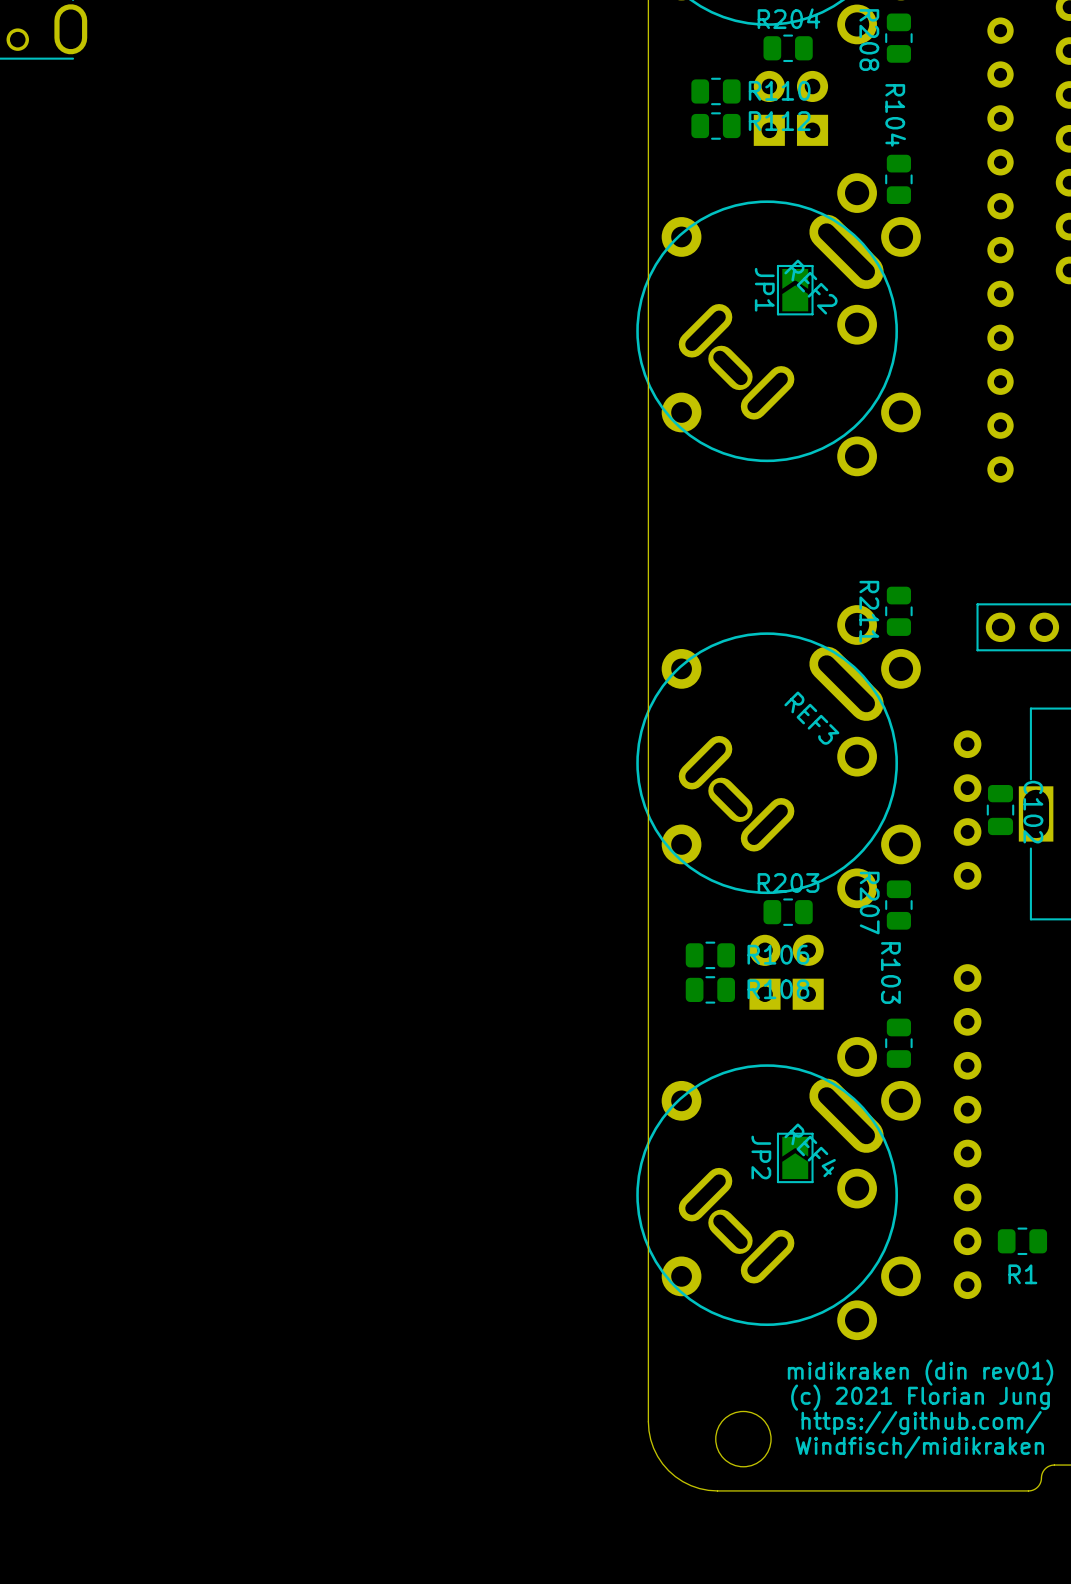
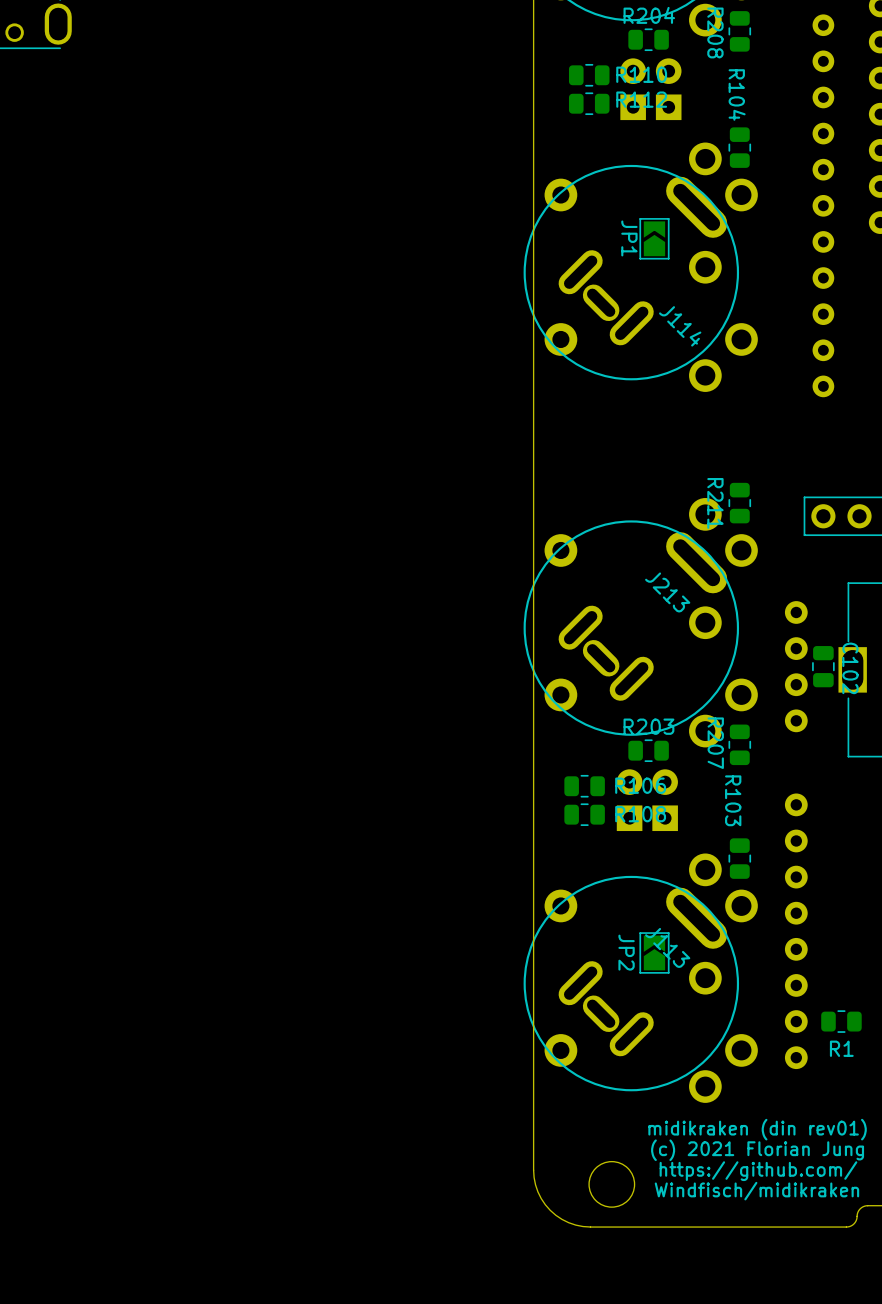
REF2 name: REF2 (811, 287) -> J114 (680, 326)
REF3 name: REF3 (811, 718) -> J213 (667, 592)
REF4 name: REF4 (810, 1150) -> J113 (667, 947)

